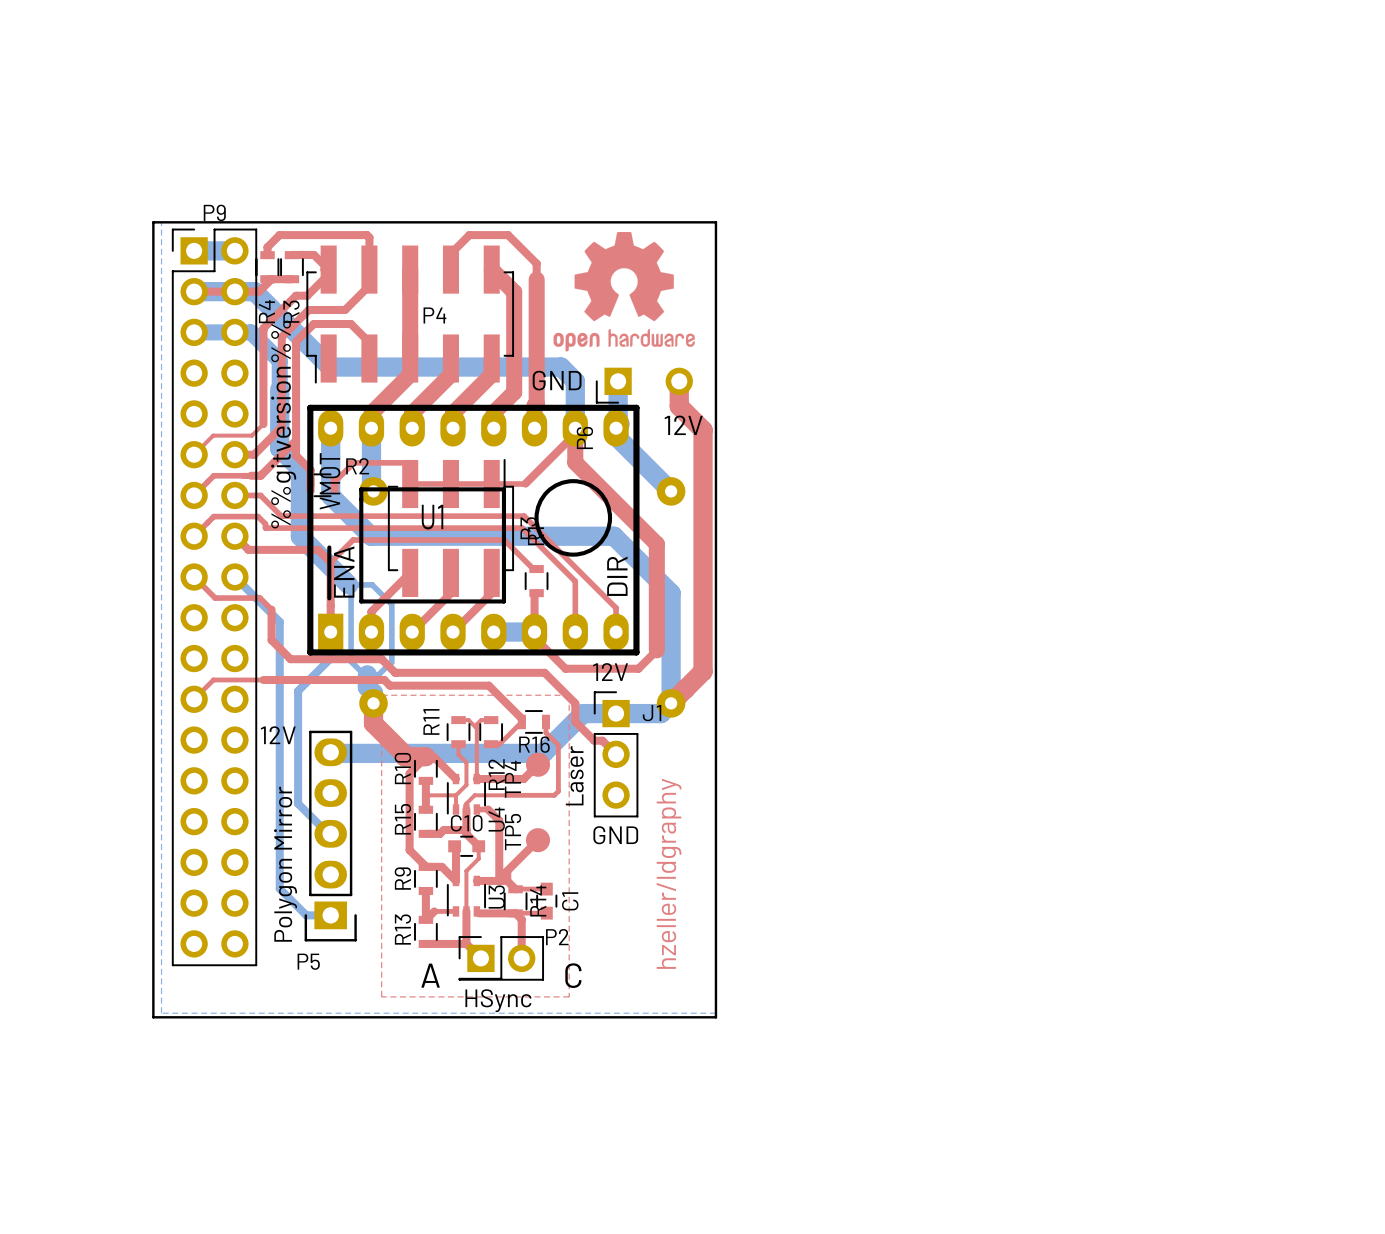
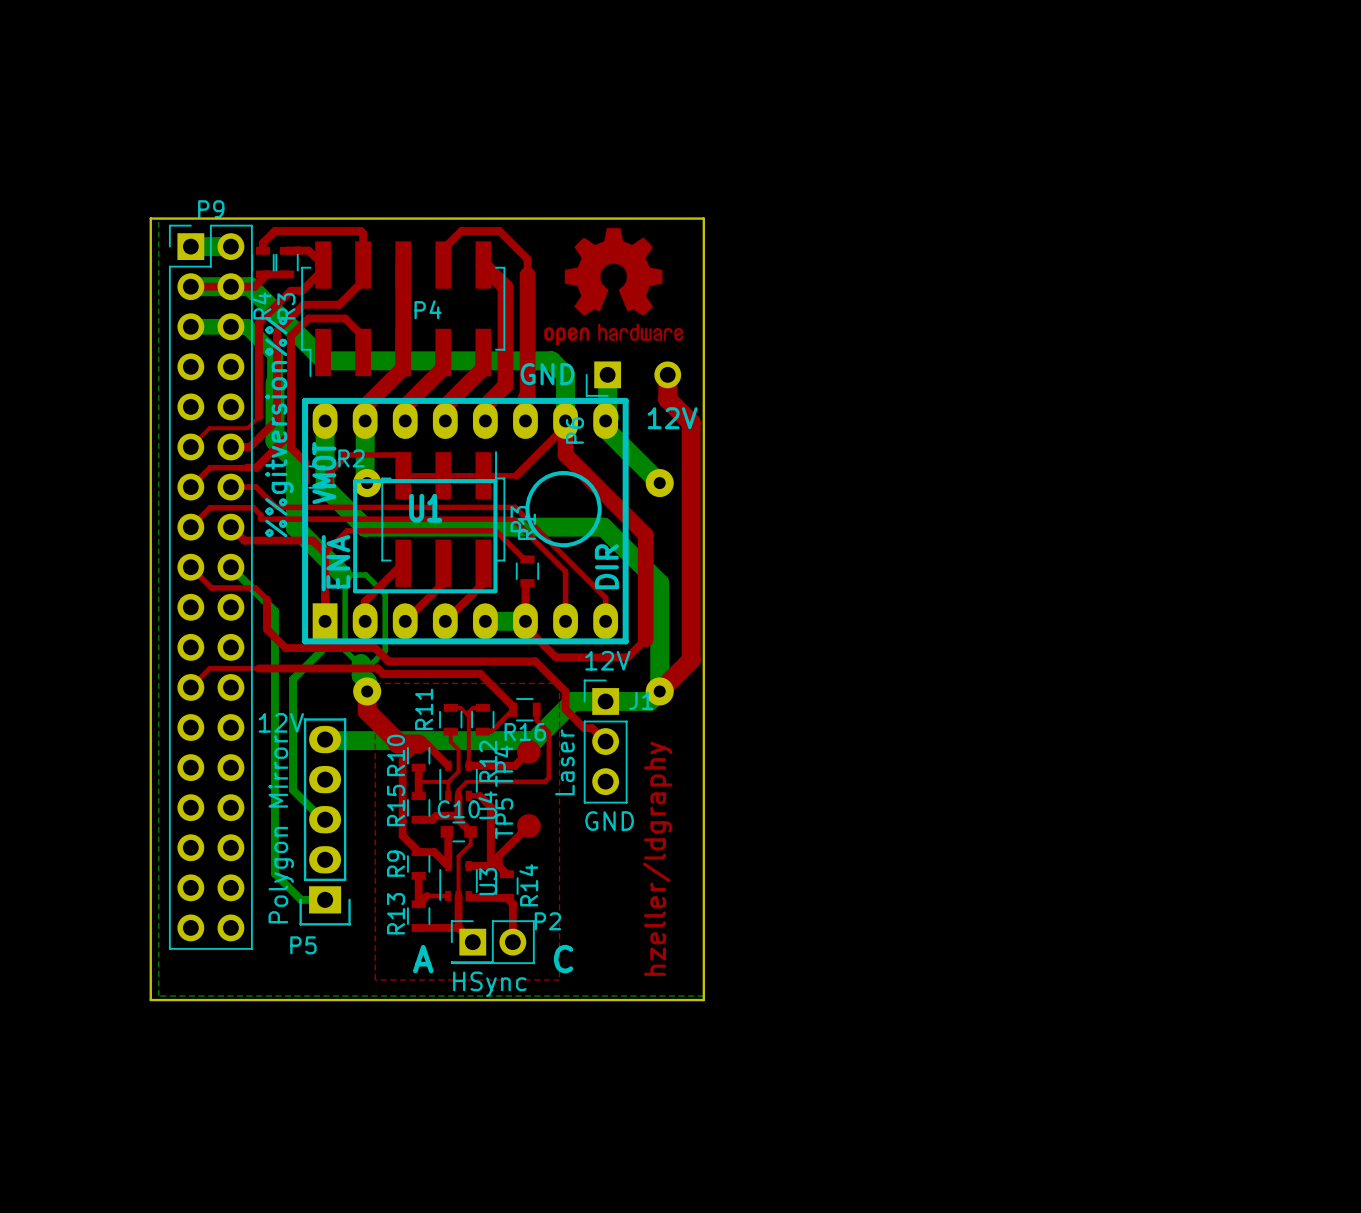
top track: (515, 889) (546, 889) -> none
C1: (546, 901) -> none
top track: (515, 913) (546, 913) -> none

